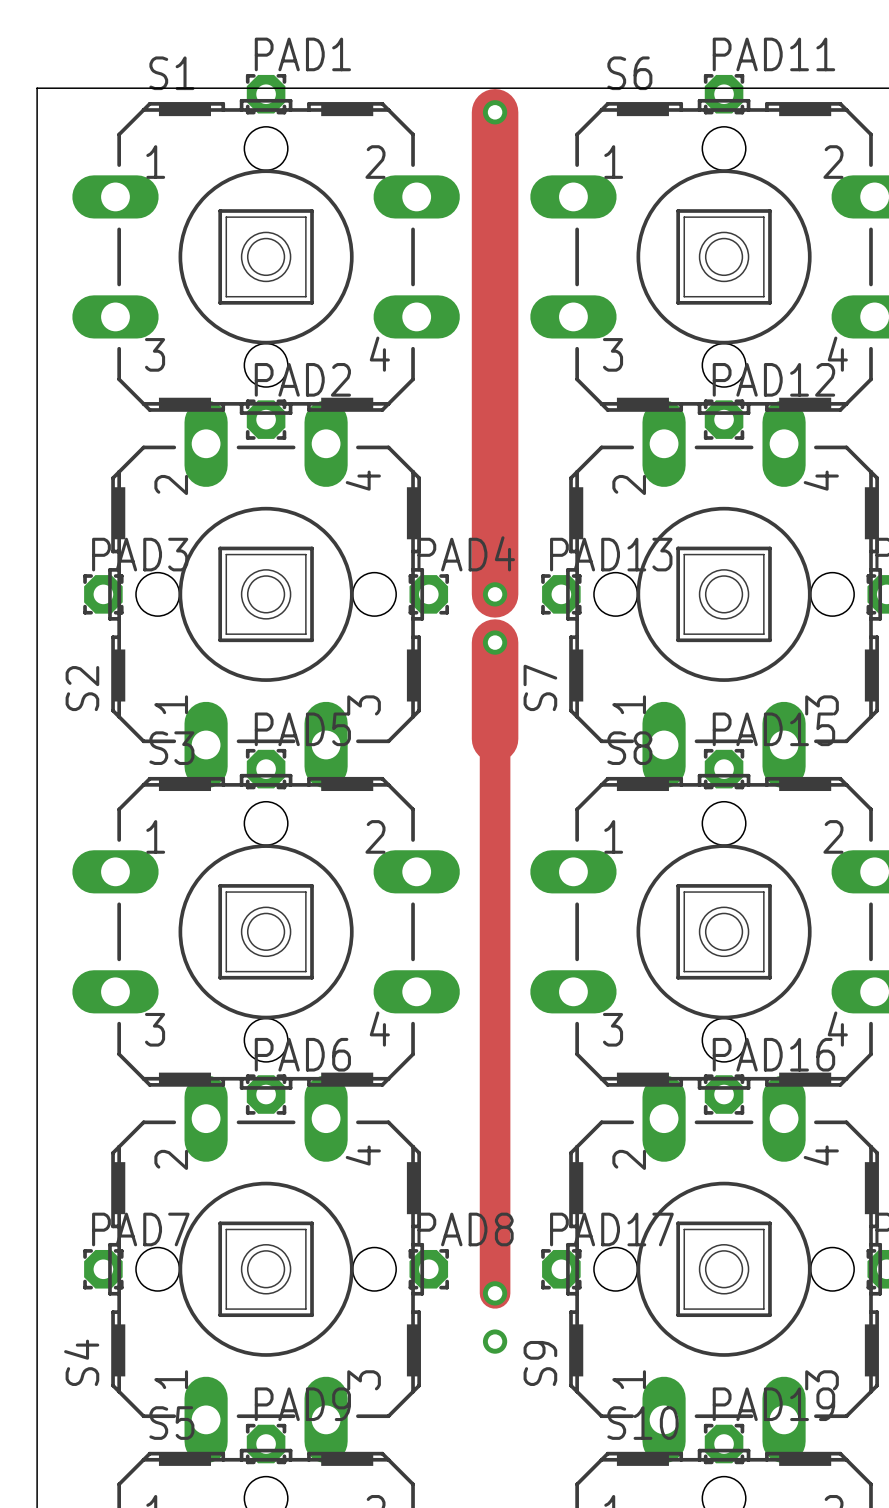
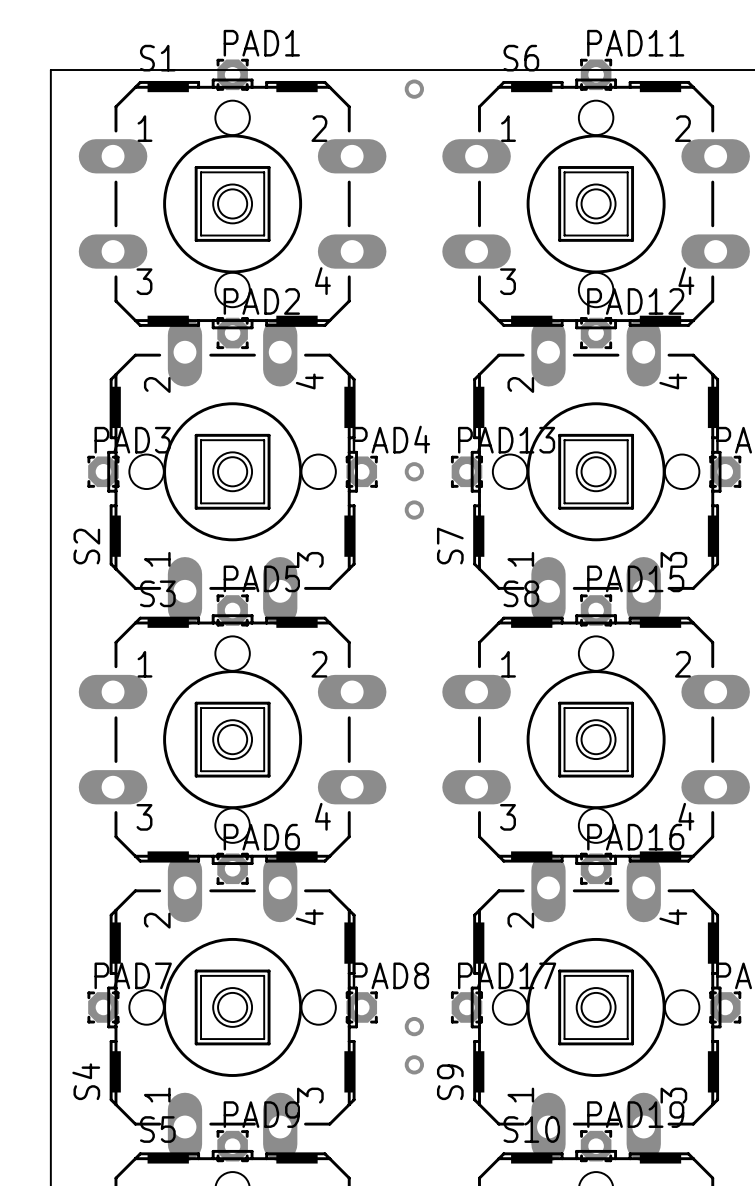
track: (495, 112) (495, 594) -> none
track: (495, 642) (495, 1293) -> none

